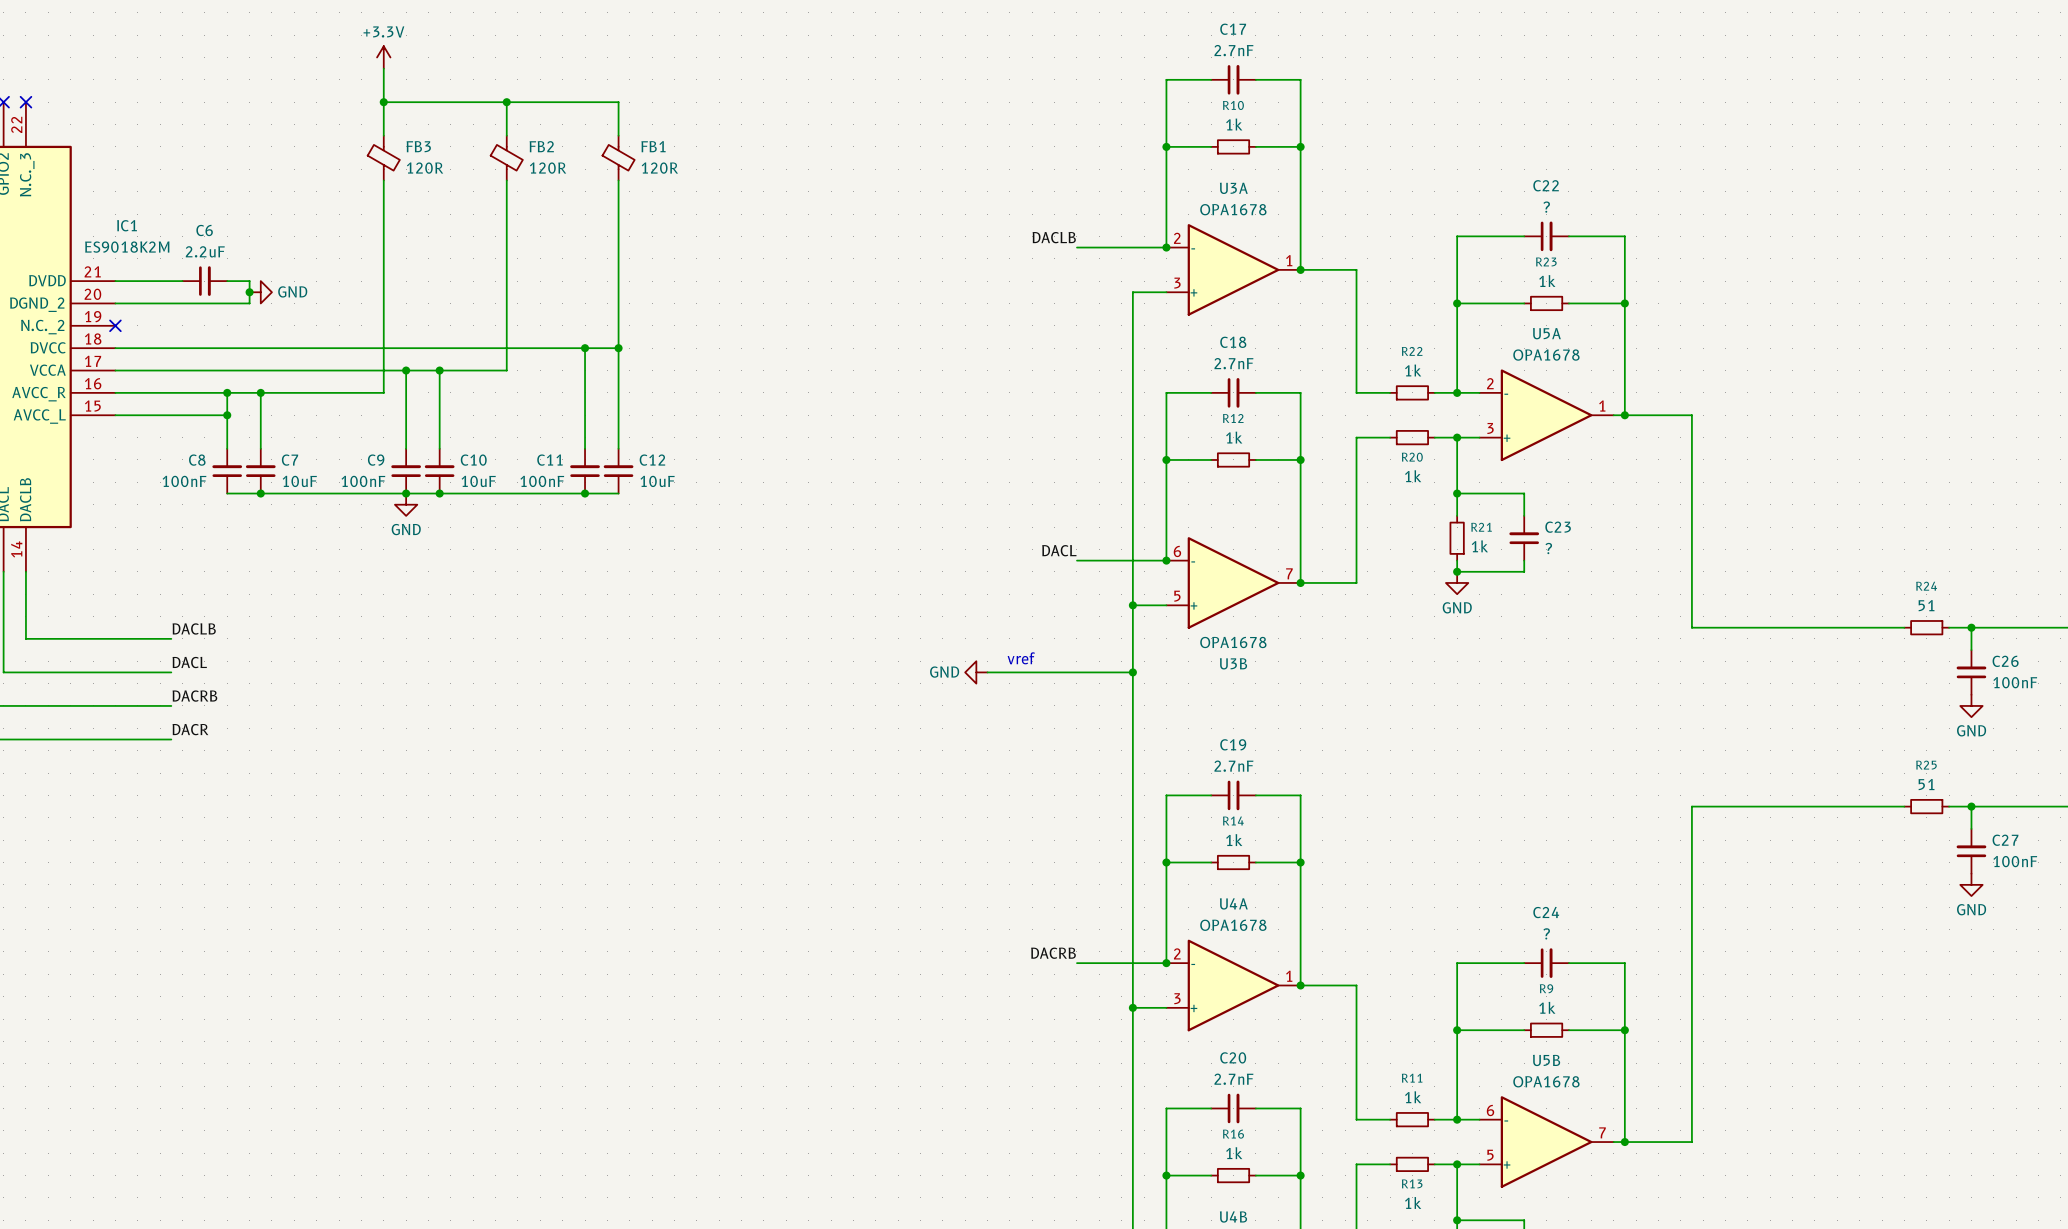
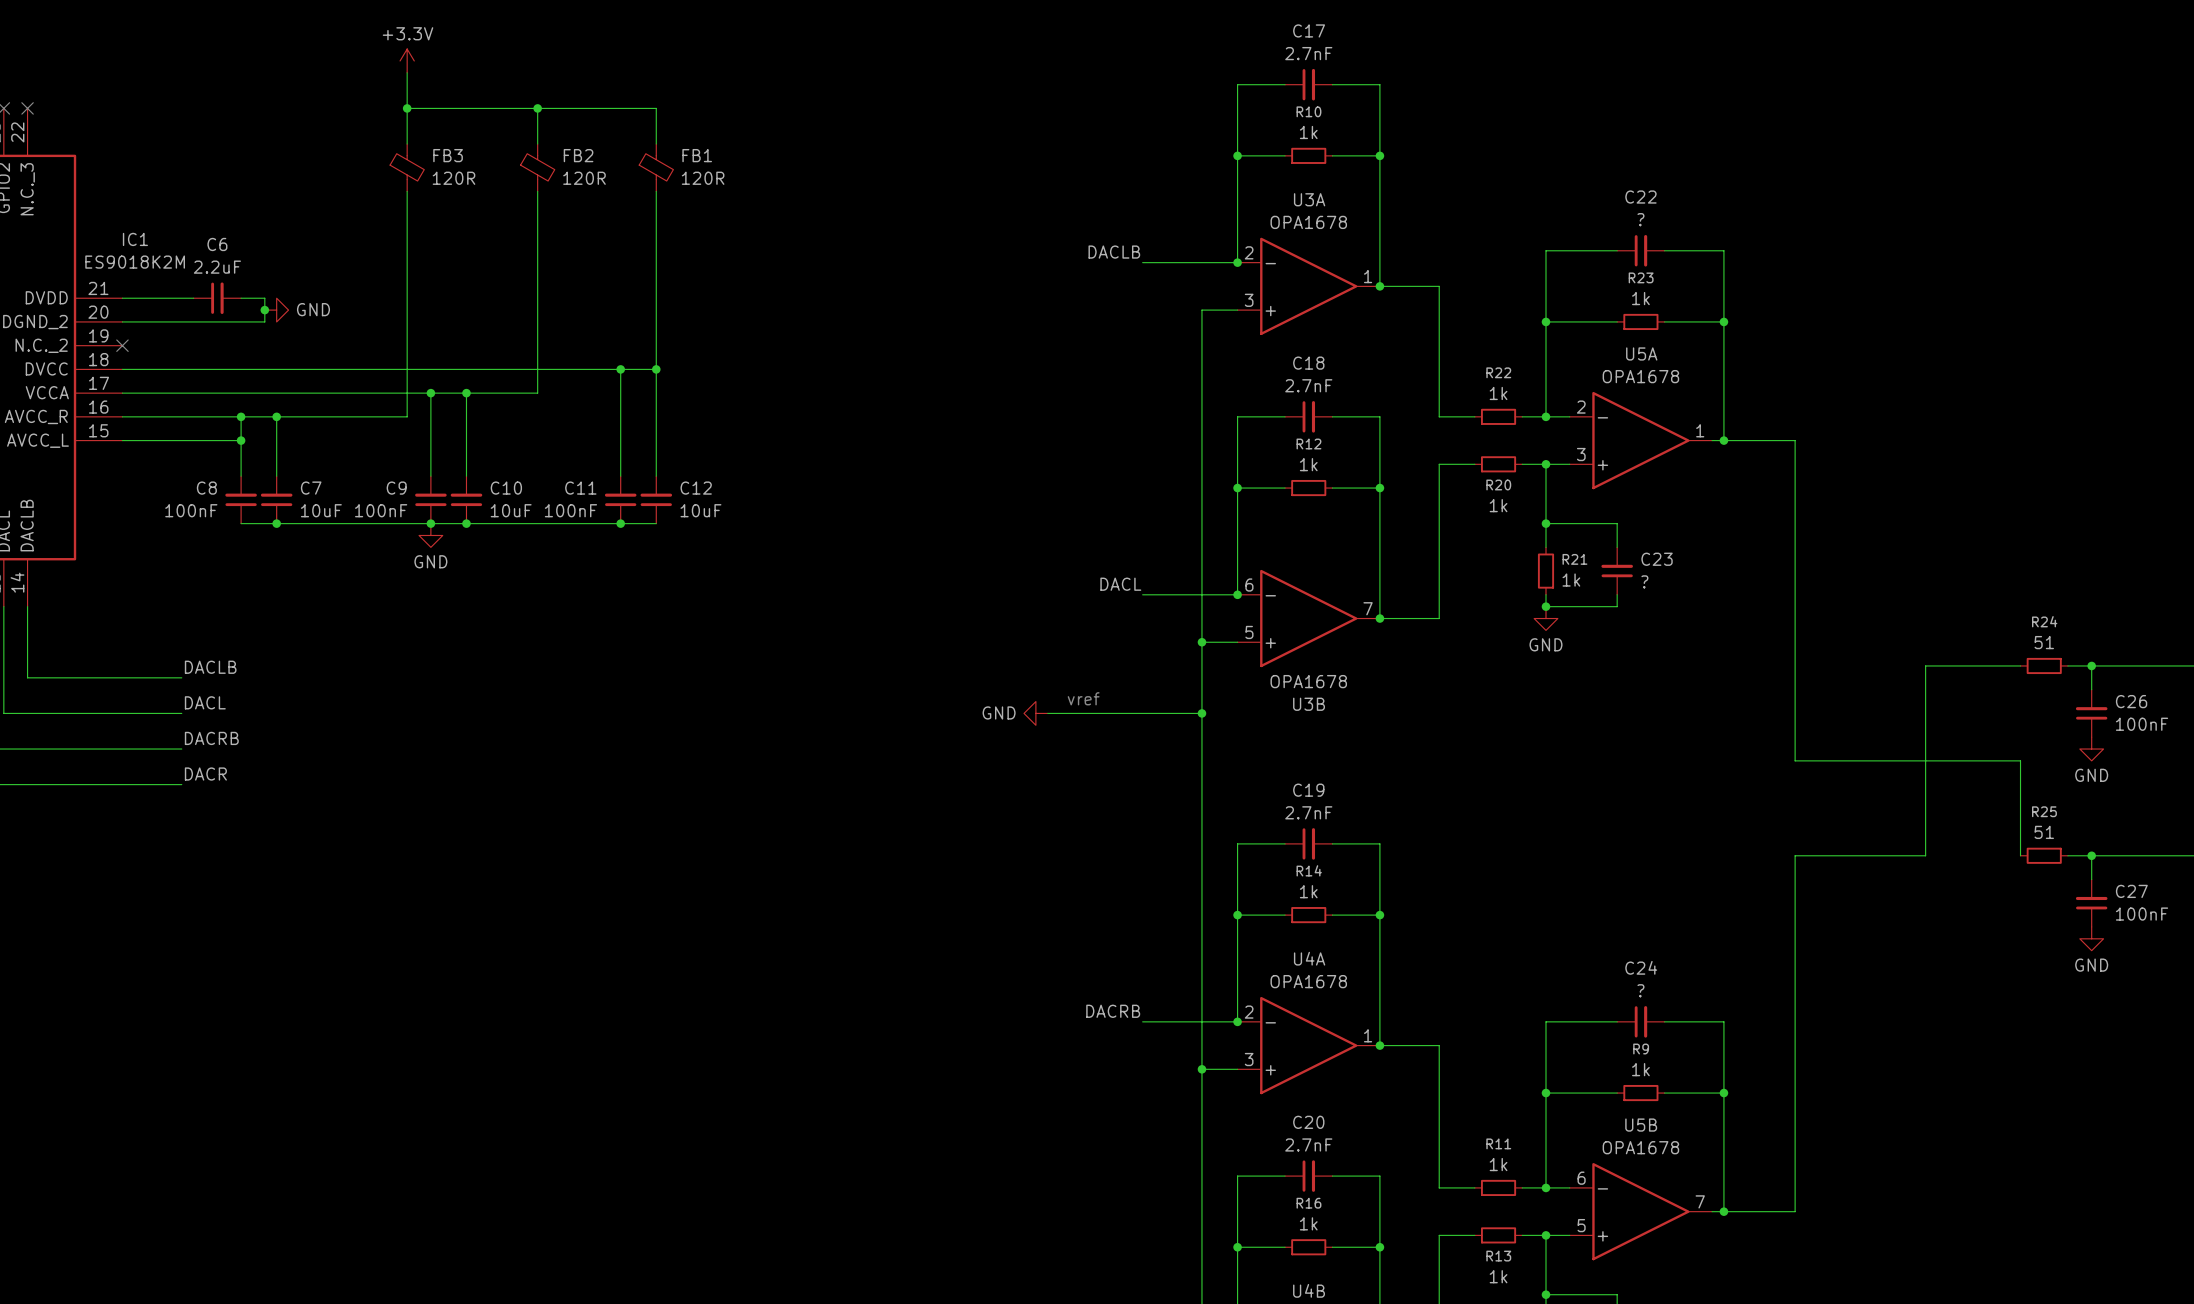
wire: (1691, 627) (1814, 627) -> (1795, 665) (1795, 760) (2020, 760) (2020, 855)
wire: (1814, 806) (1904, 806) -> (1925, 855) (1925, 665)

